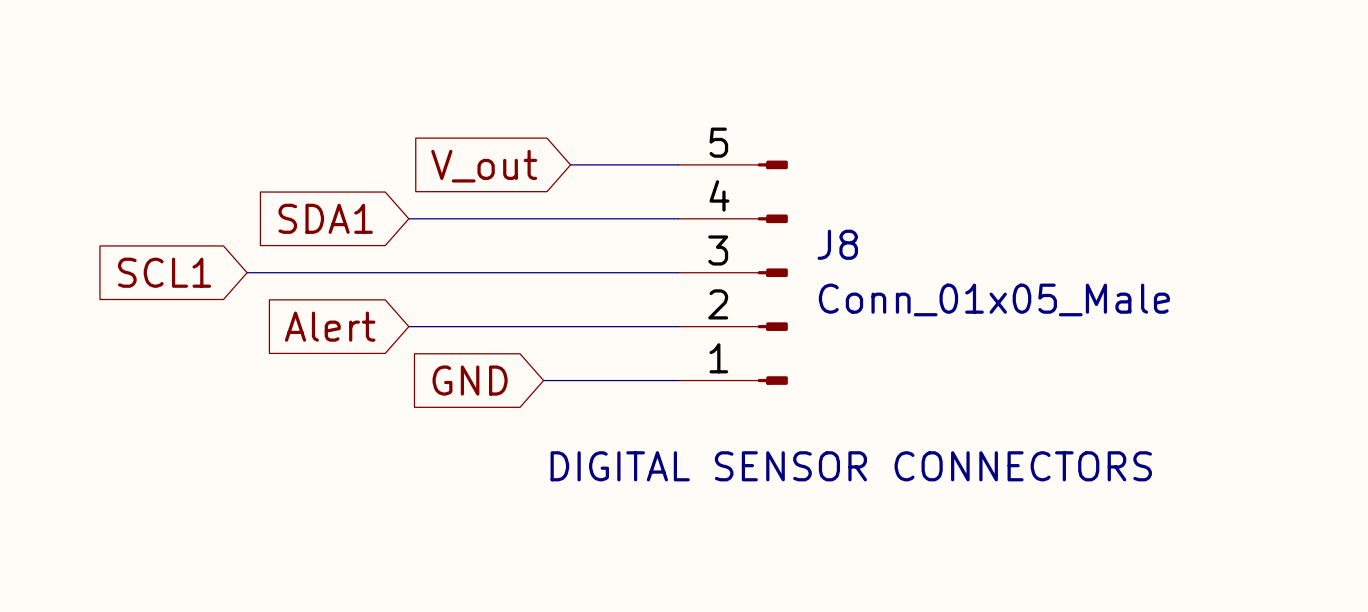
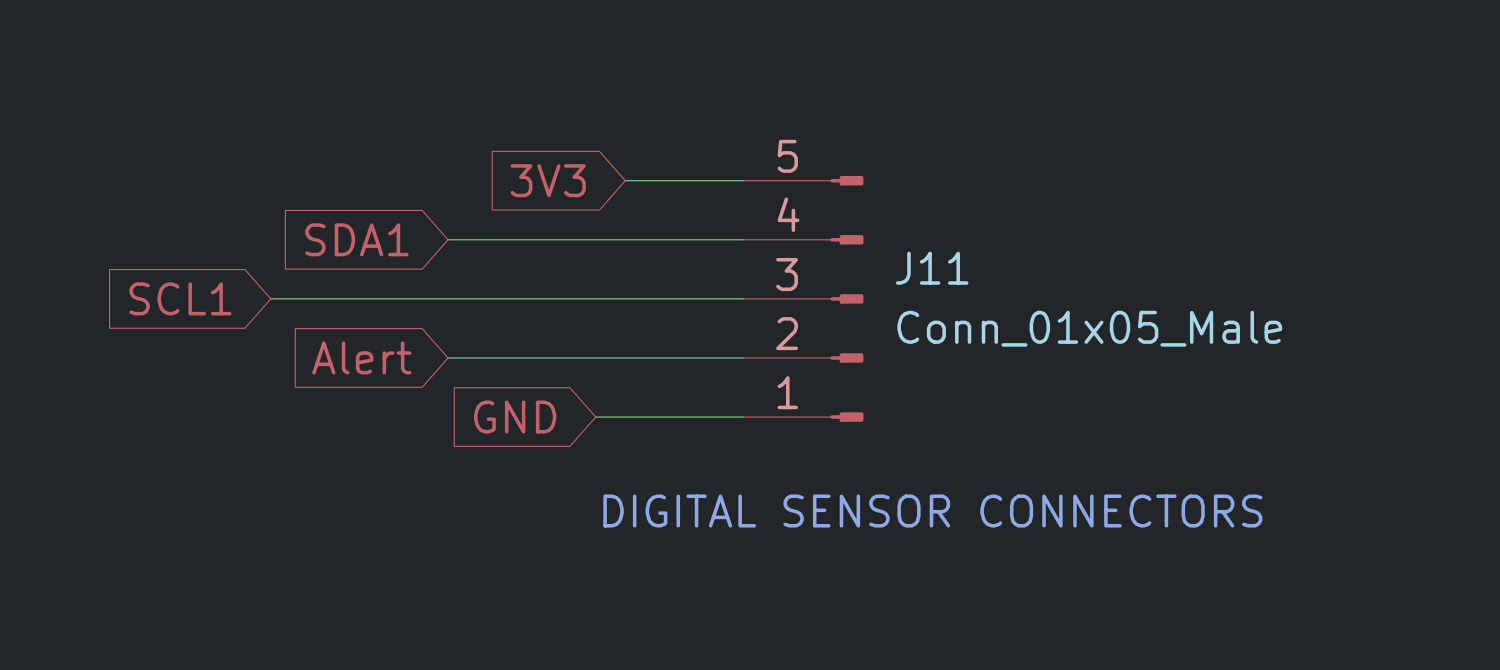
global label: V_out (484, 166) -> 3V3 (548, 180)
J8 name: J8 (837, 244) -> J11 (932, 268)

